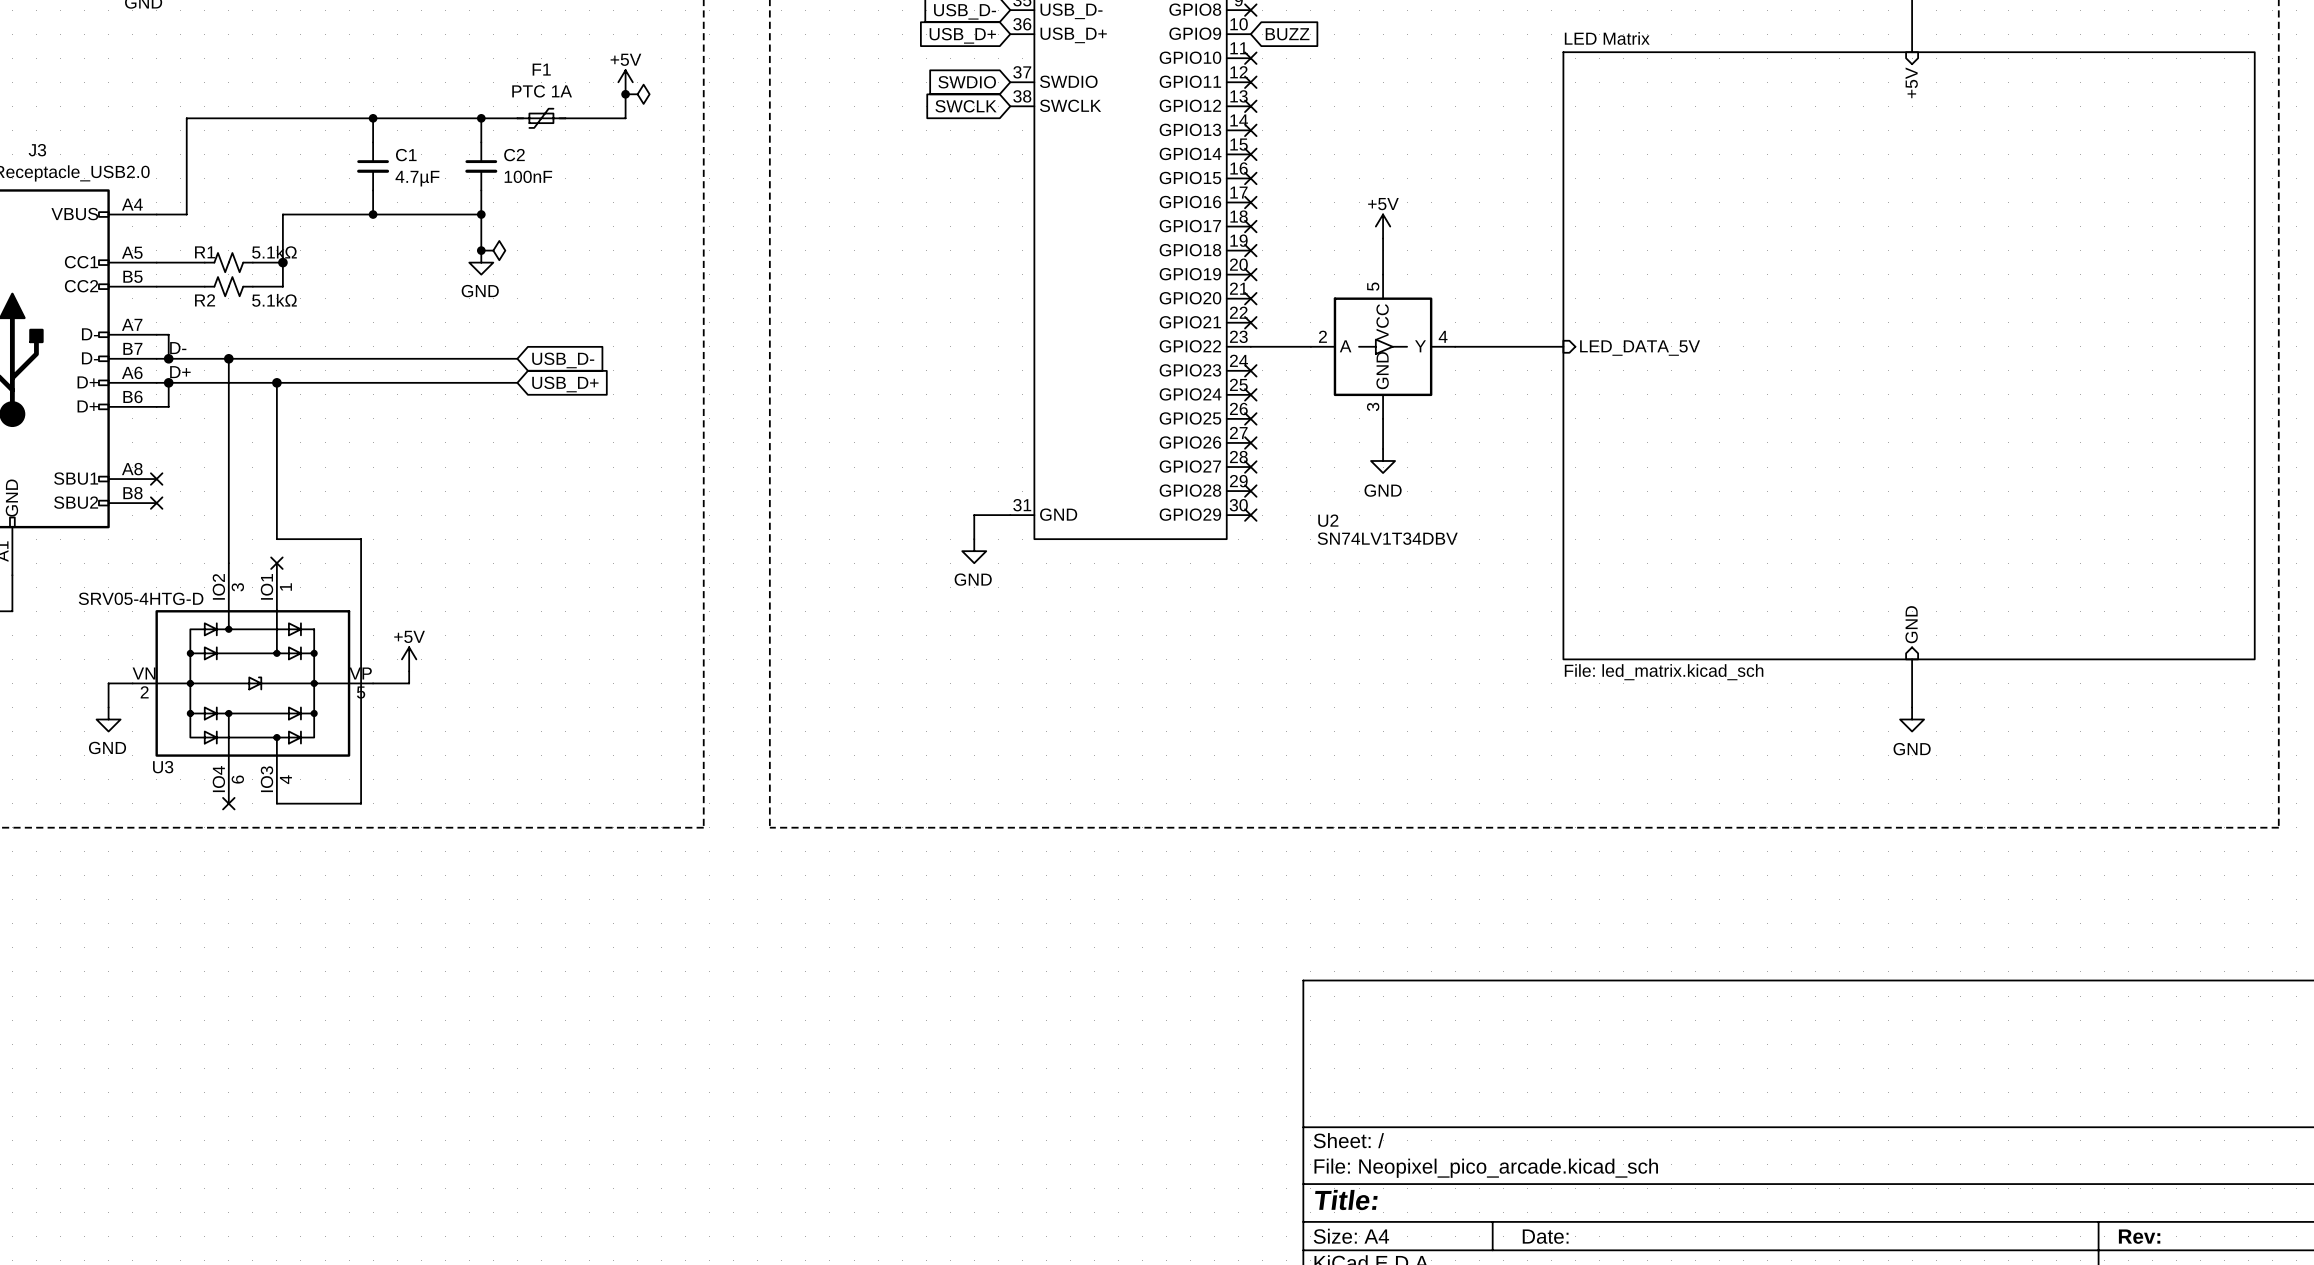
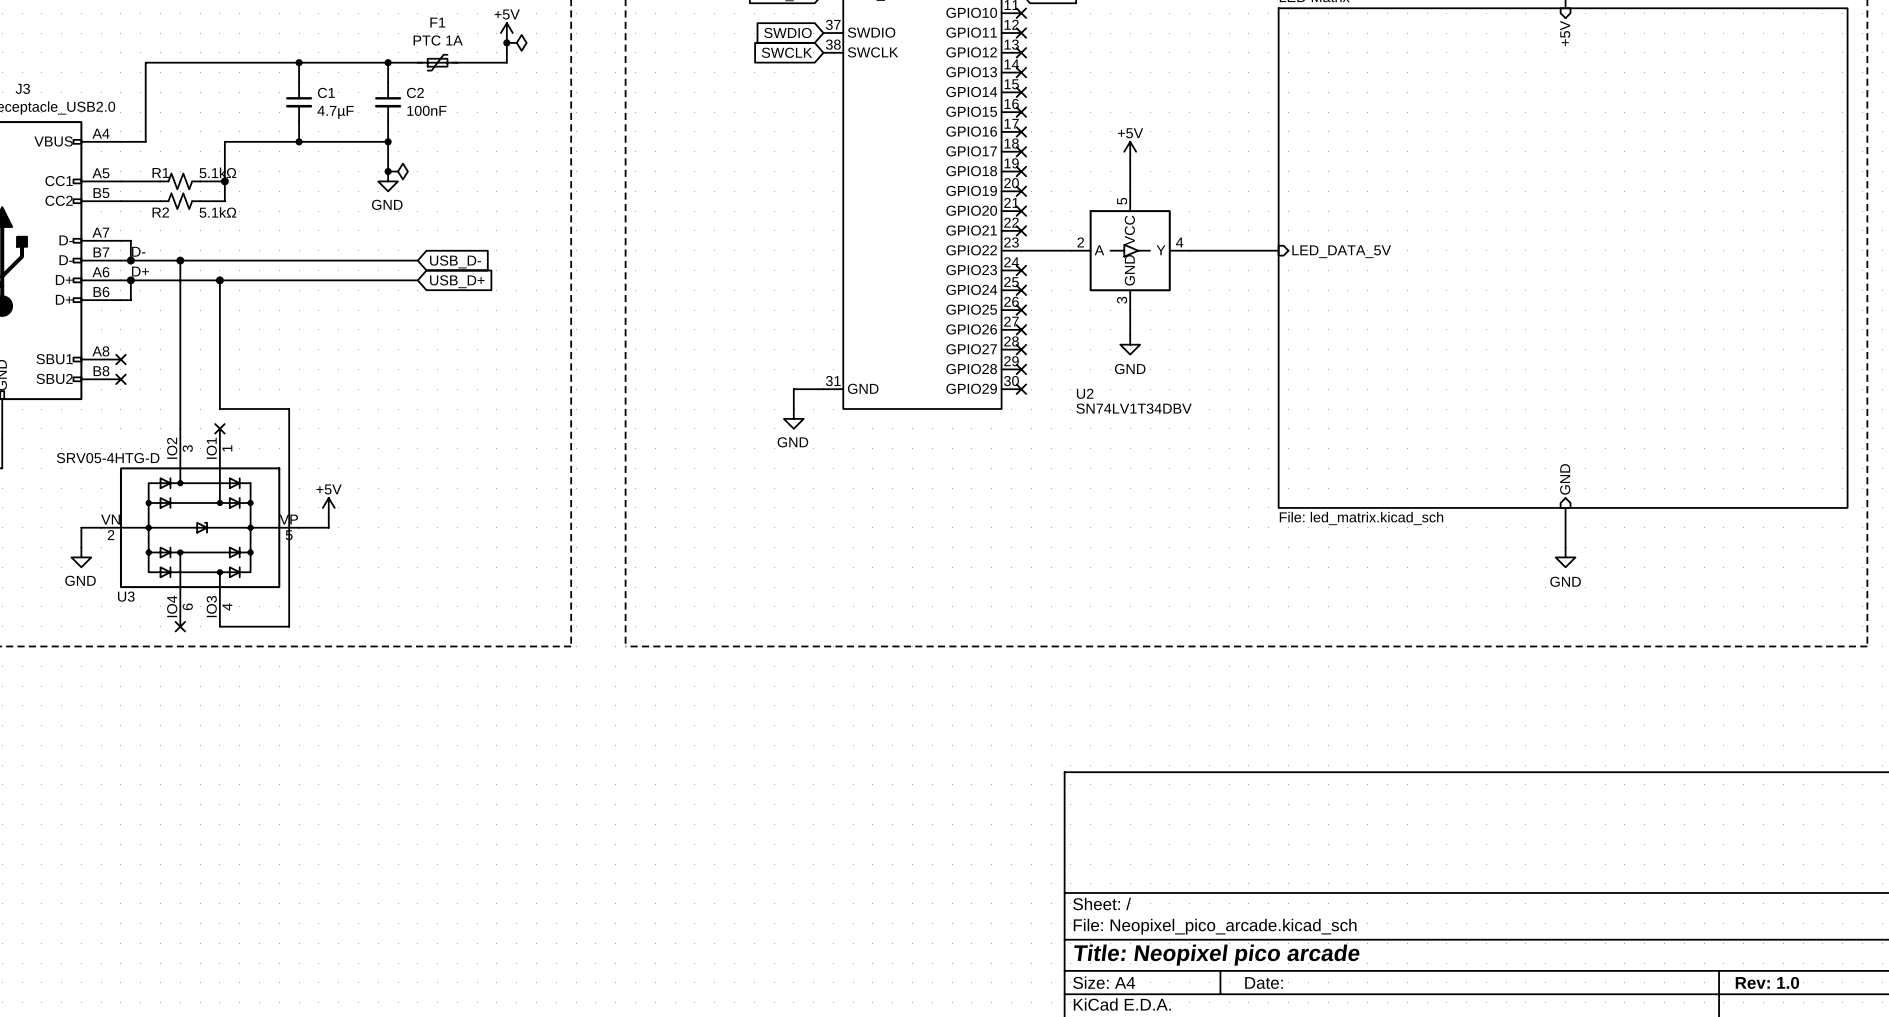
title block: Title: (1346, 1200) -> Title: Neopixel pico arcade (1216, 955)
title block: Rev: (2139, 1236) -> Rev: 1.0 (1767, 982)

